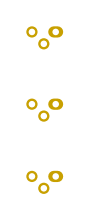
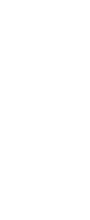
part: (44, 37) -> none
part: (44, 110) -> none
part: (44, 182) -> none

